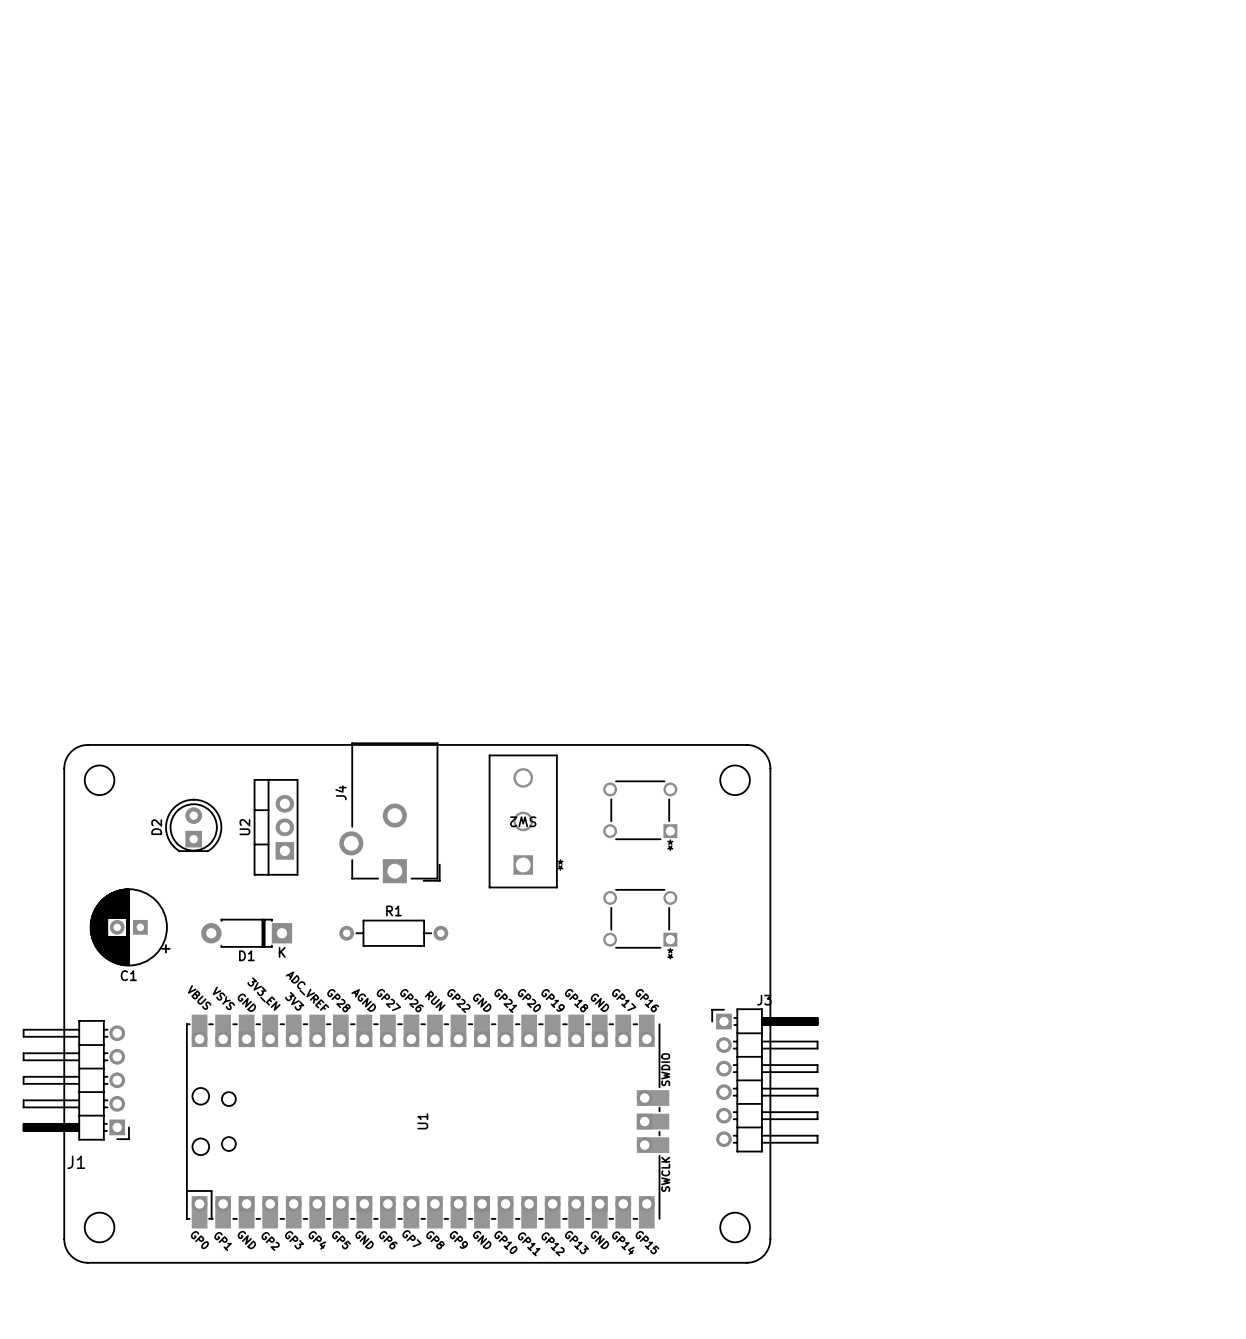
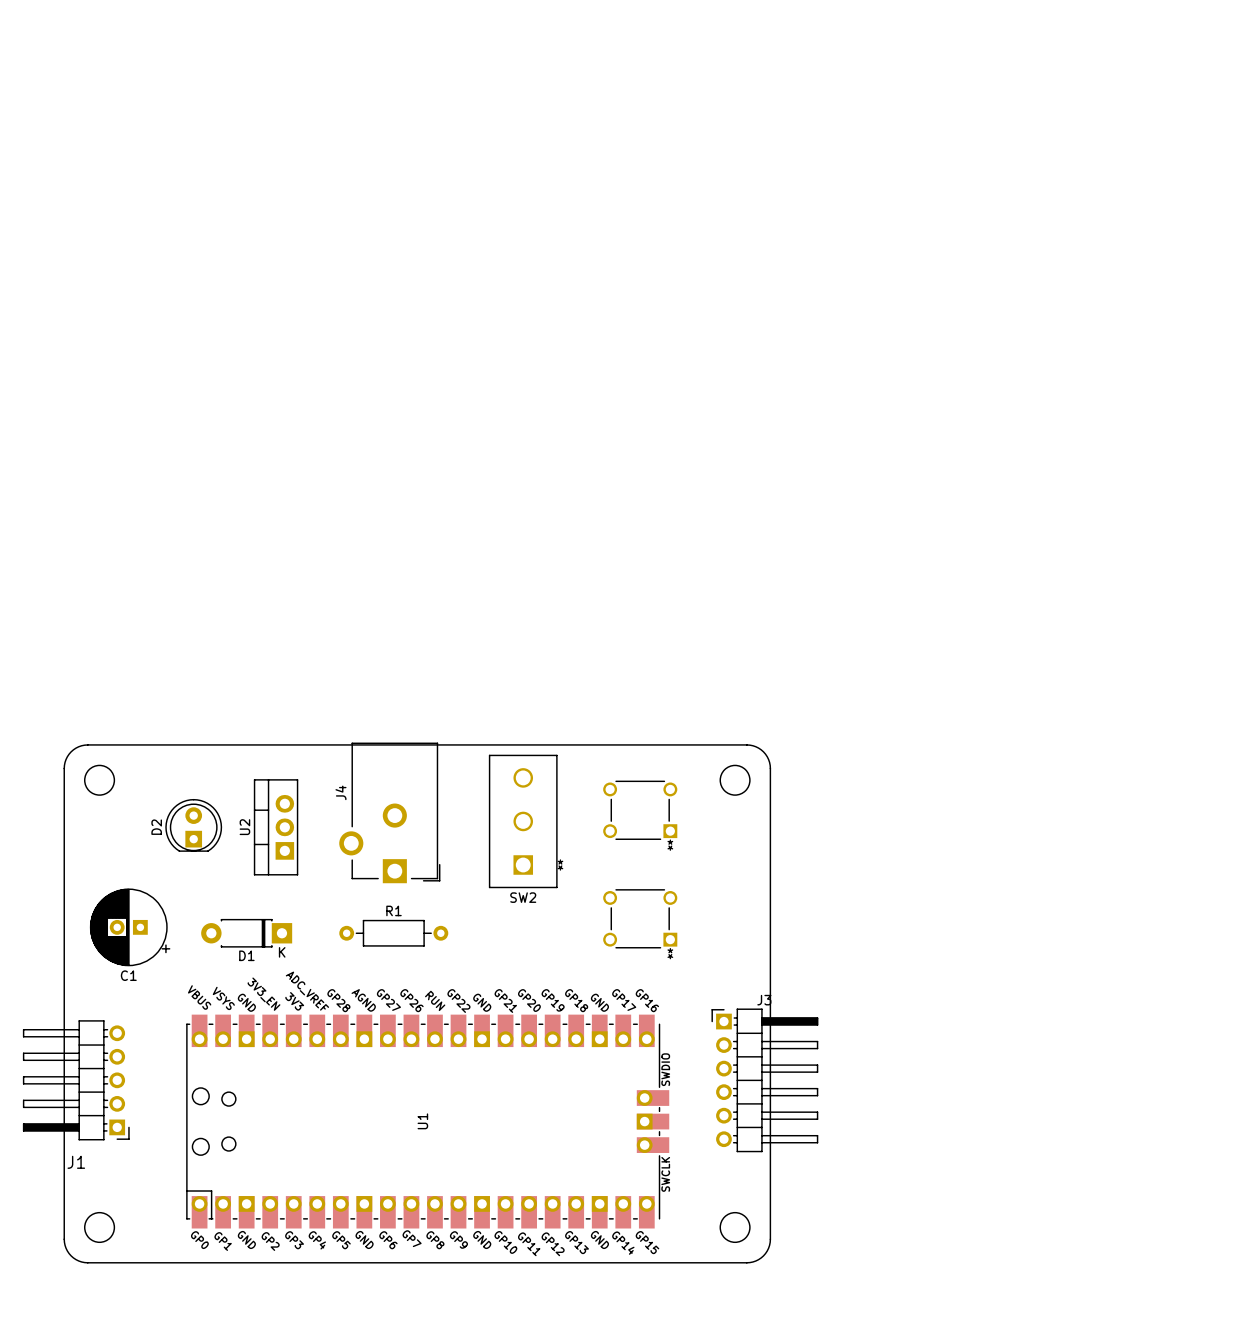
SW2 name rotation: 0° (523, 821) -> 180° (523, 897)
SW2 name position: SW2 (523, 821) -> SW2 (523, 897)

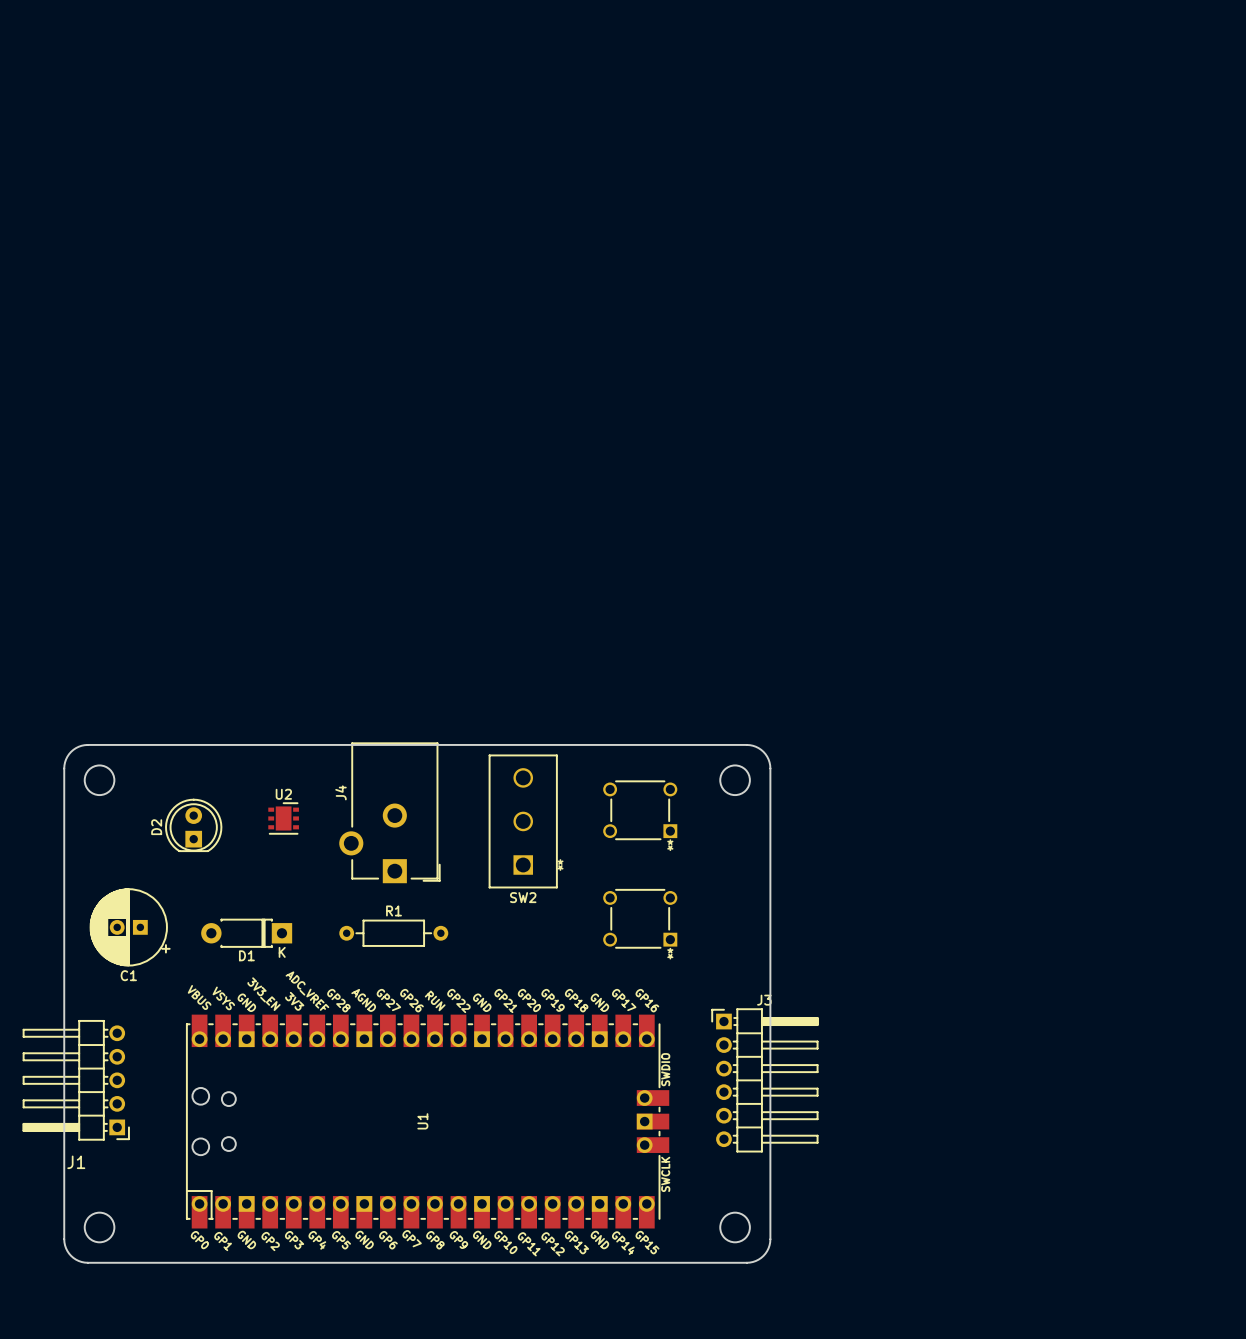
U2 footprint: [253, 779, 299, 876] -> [268, 802, 299, 835]
U2 name position: U2 (244, 827) -> U2 (283, 794)

